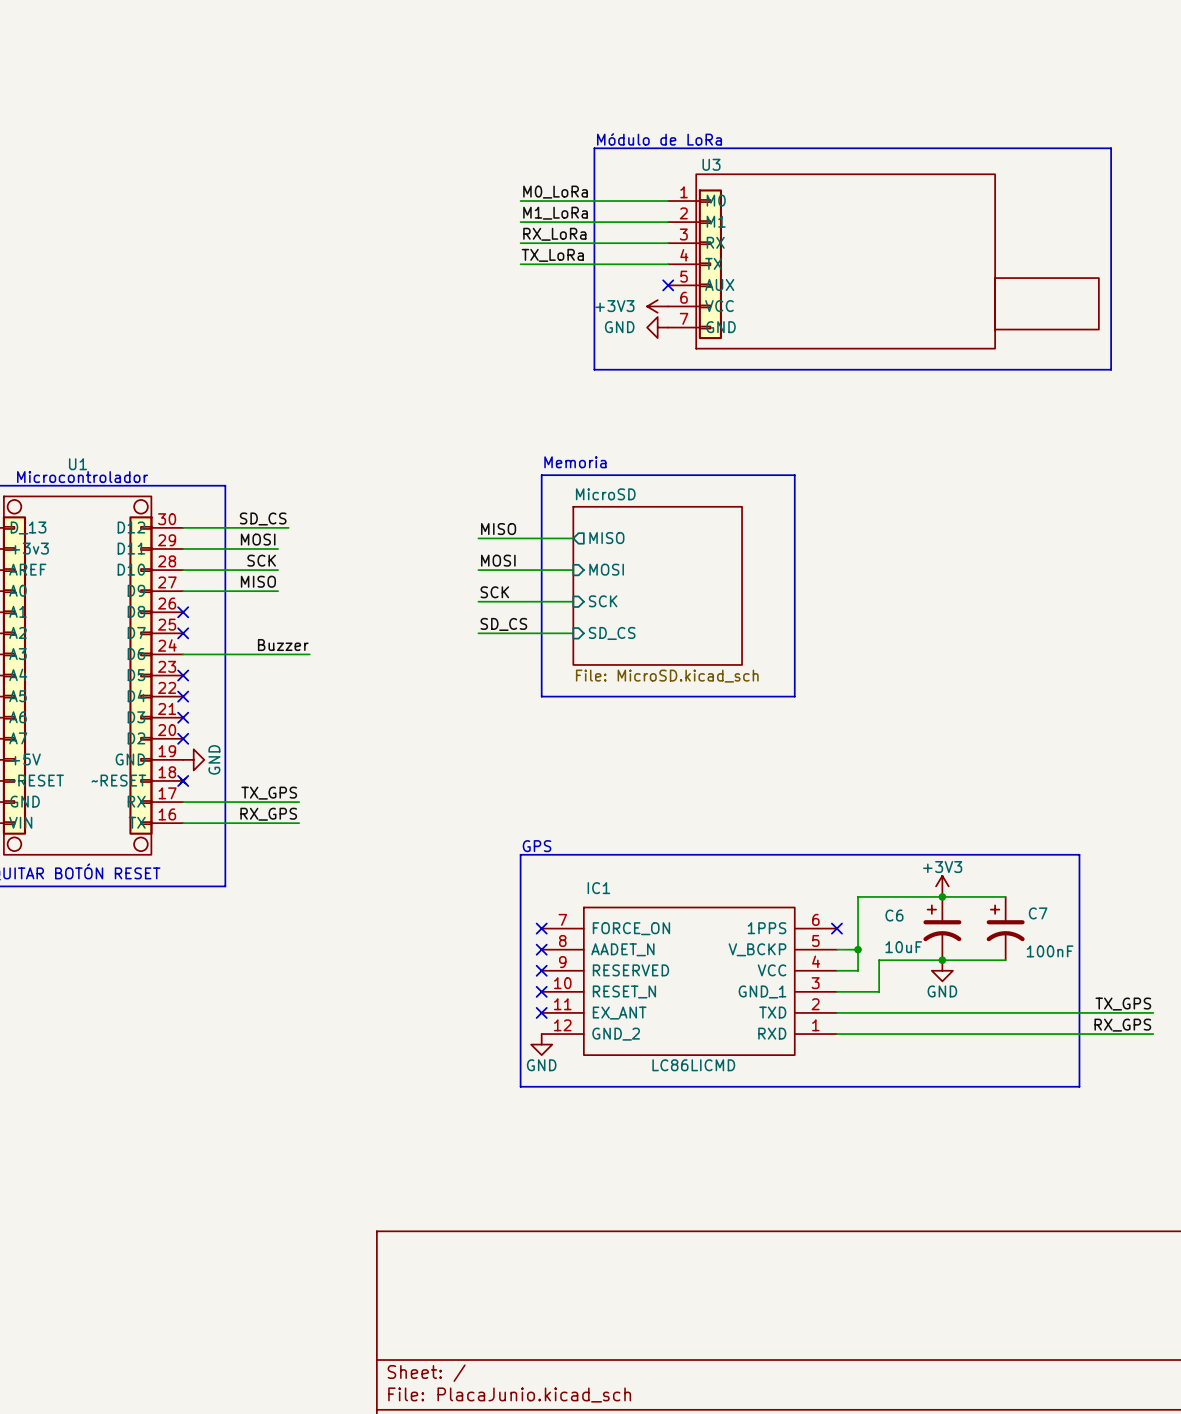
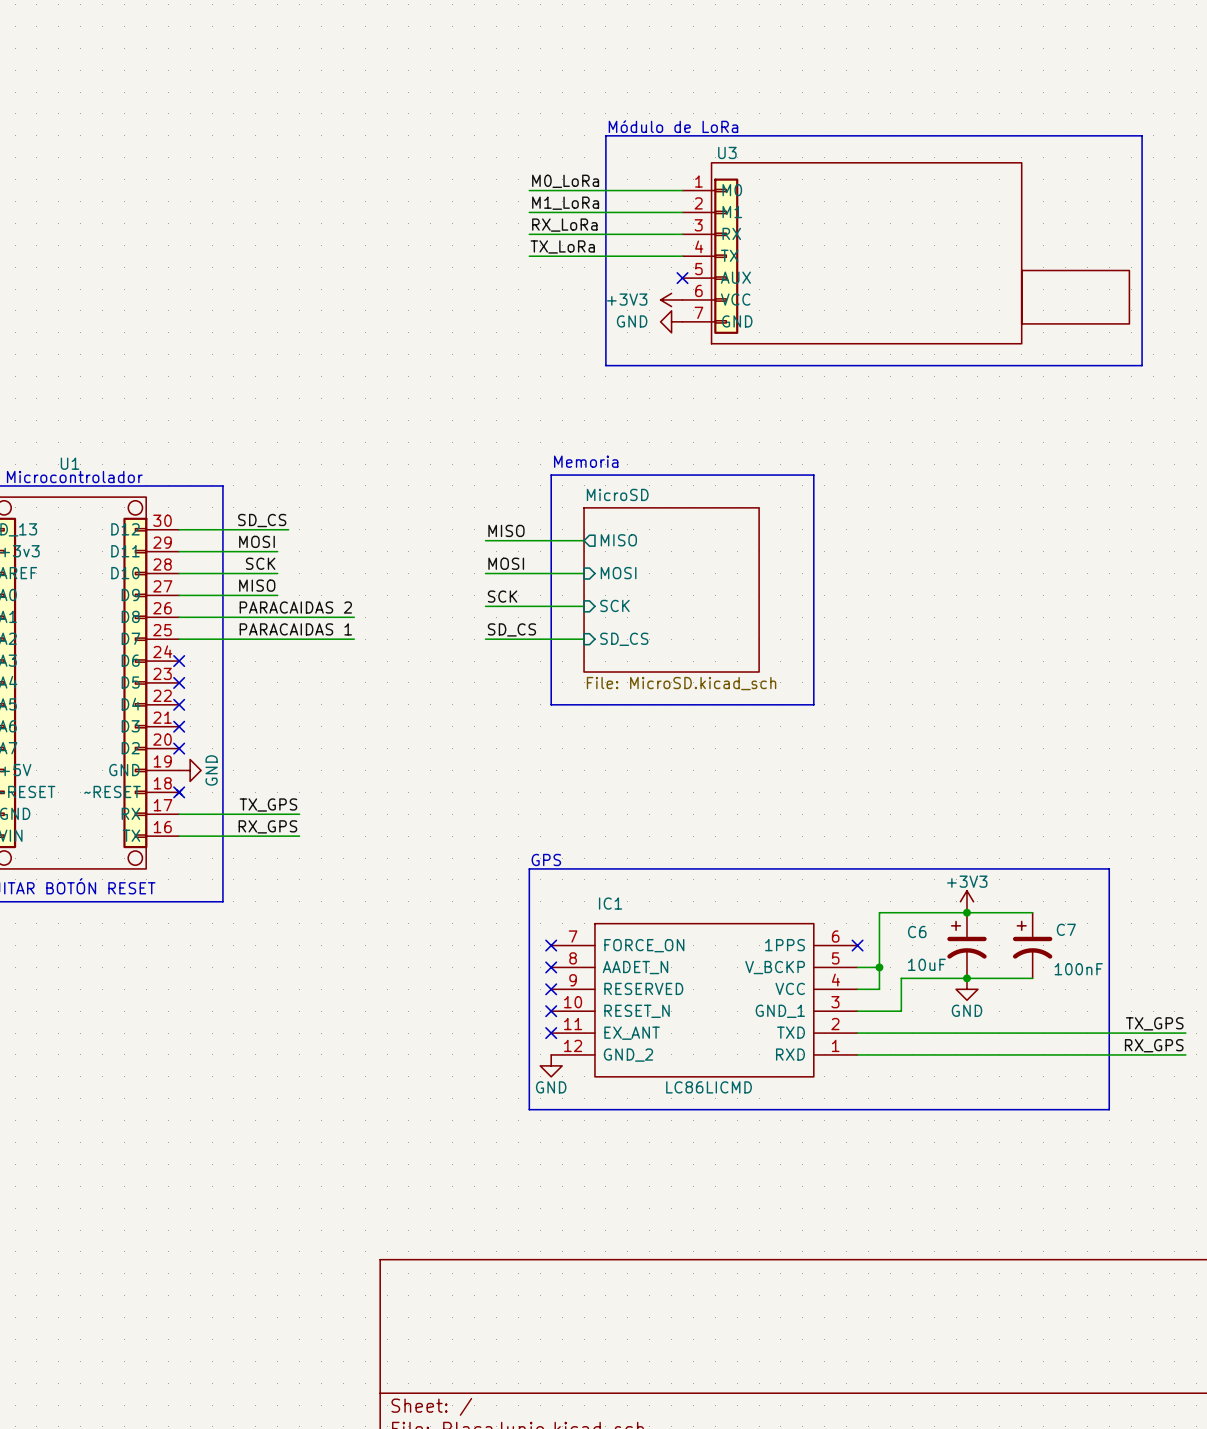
label: none -> PARACAIDAS 2 (295, 607)
wire: none -> (179, 617) (354, 617)
no-connect mark: (183, 612) -> none
label: none -> PARACAIDAS 1 (295, 629)
wire: none -> (179, 639) (354, 639)
no-connect mark: (183, 633) -> none
label: Buzzer (283, 645) -> none
wire: (183, 654) (309, 654) -> none
no-connect mark: none -> (179, 661)

